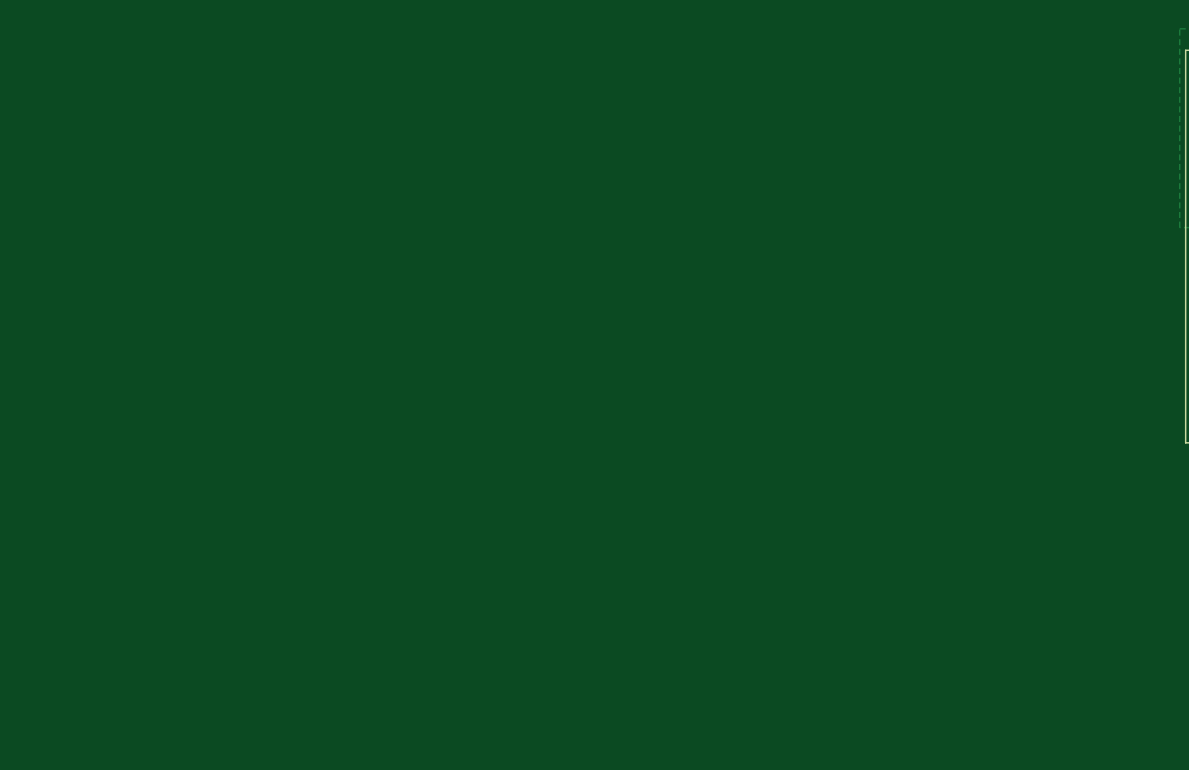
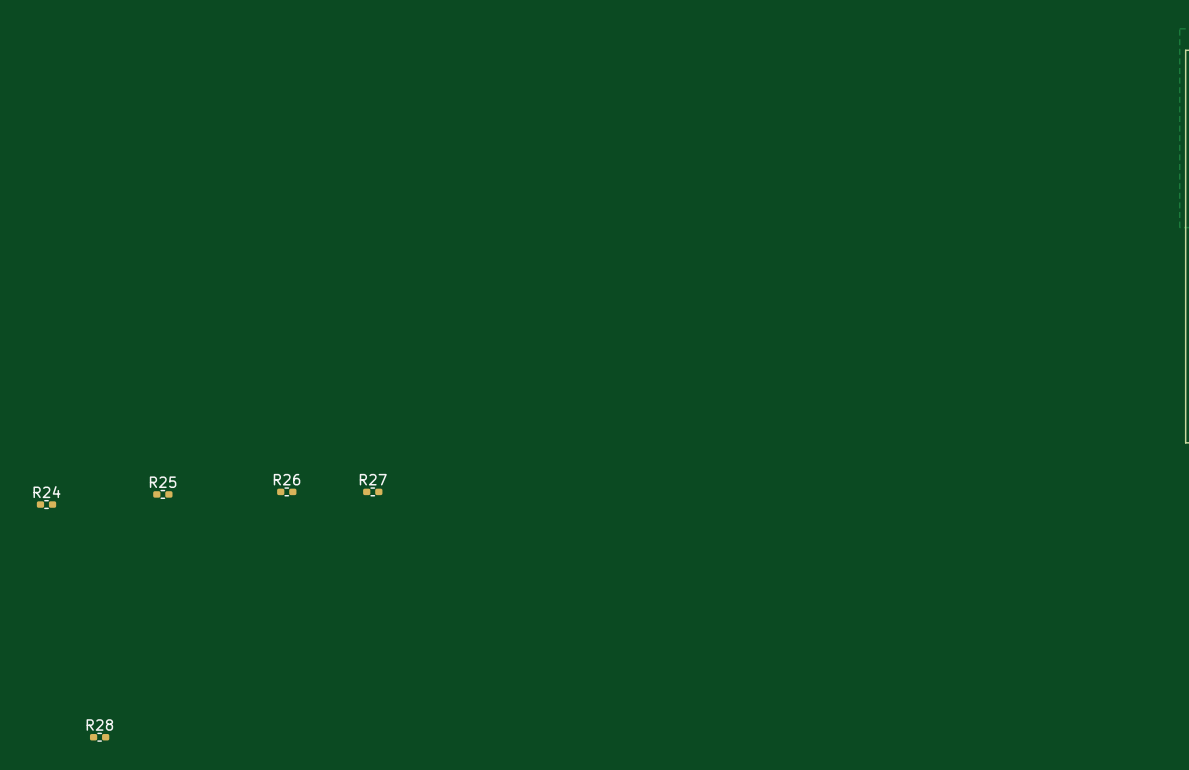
R26: none -> (286, 491)
R27: none -> (372, 491)
R25: none -> (162, 494)
R24: none -> (46, 504)
R28: none -> (99, 737)

